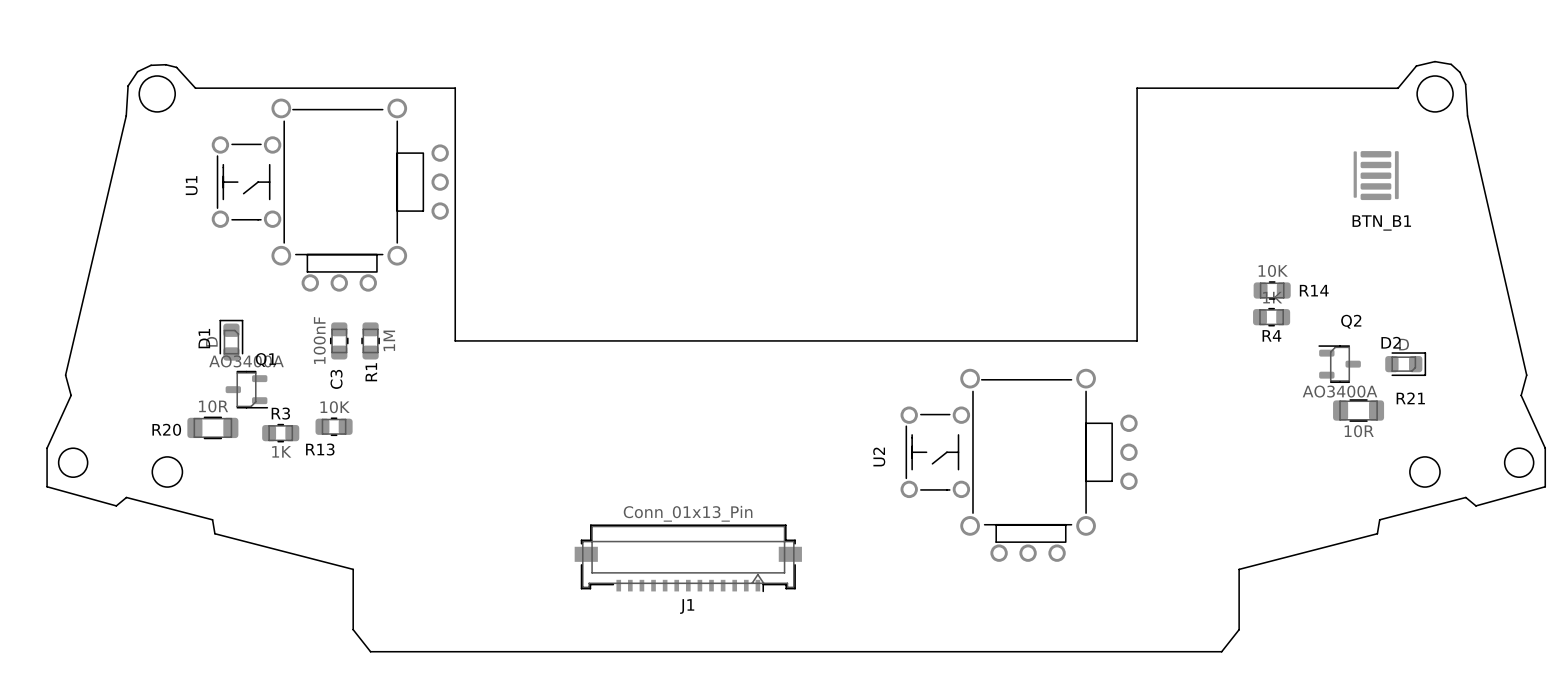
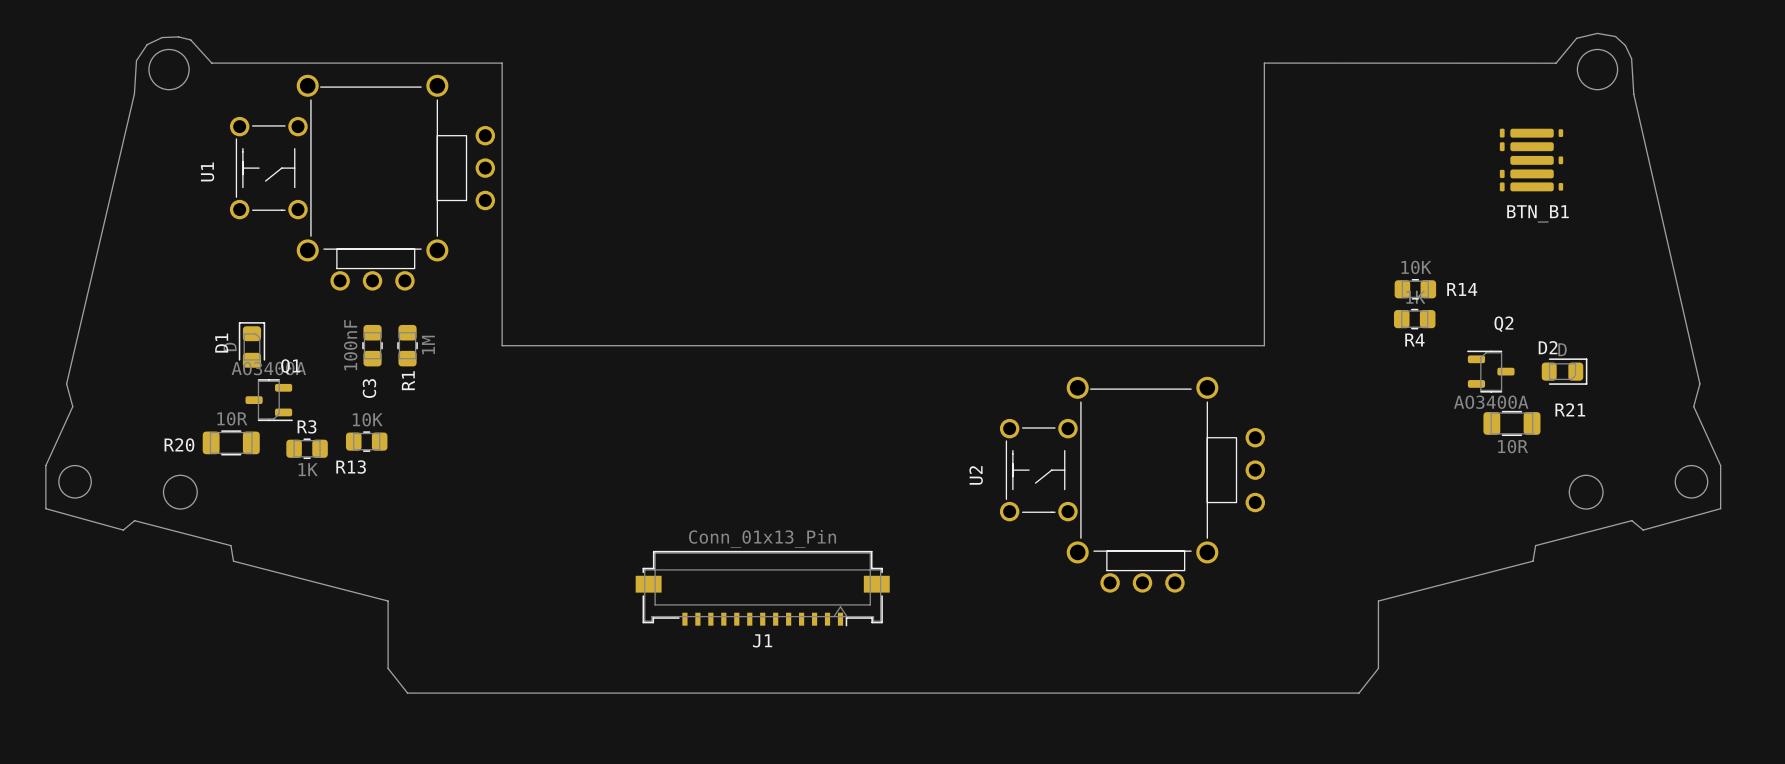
BTN_B1 footprint: [1353, 151, 1399, 201] -> [1499, 128, 1564, 192]

